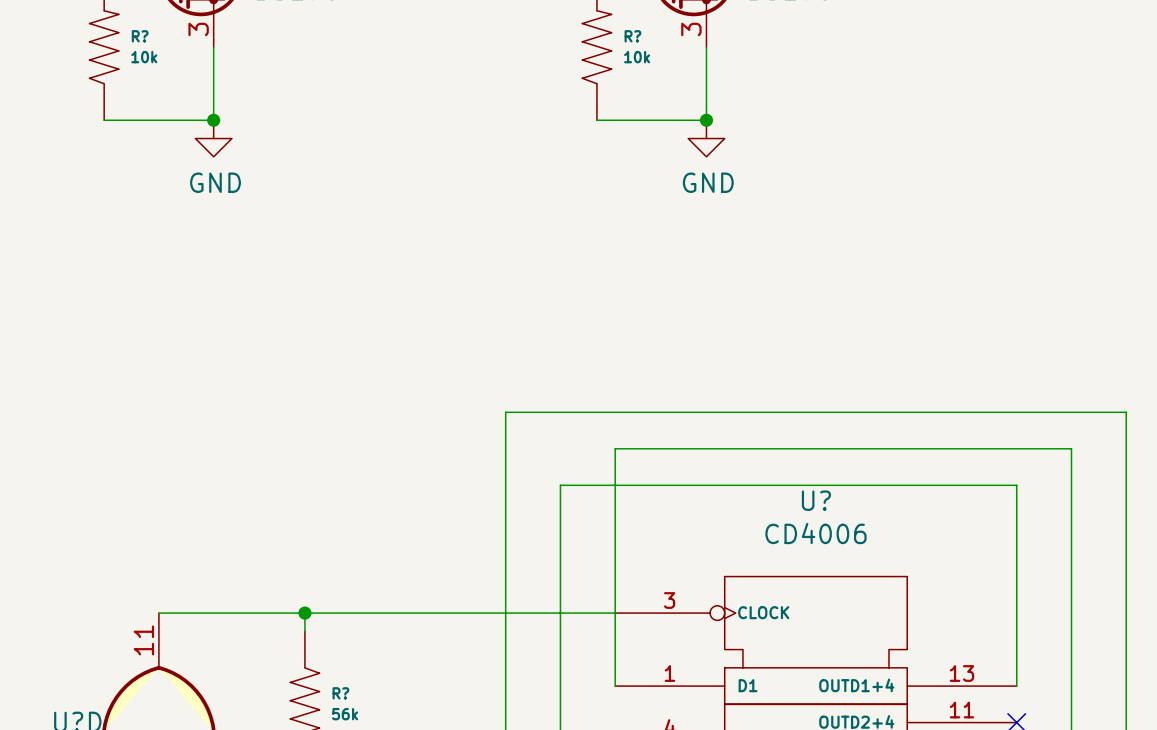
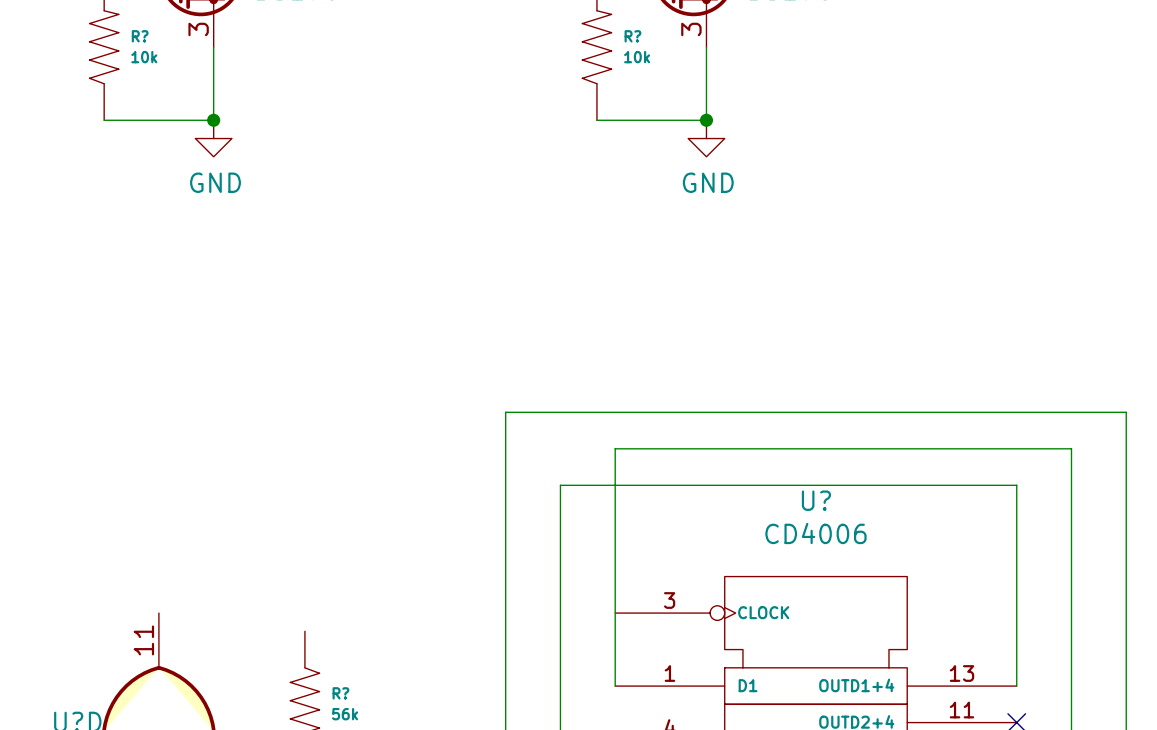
wire: (158, 613) (615, 613) -> none
wire: (304, 613) (304, 631) -> none
junction: (304, 613) -> none

